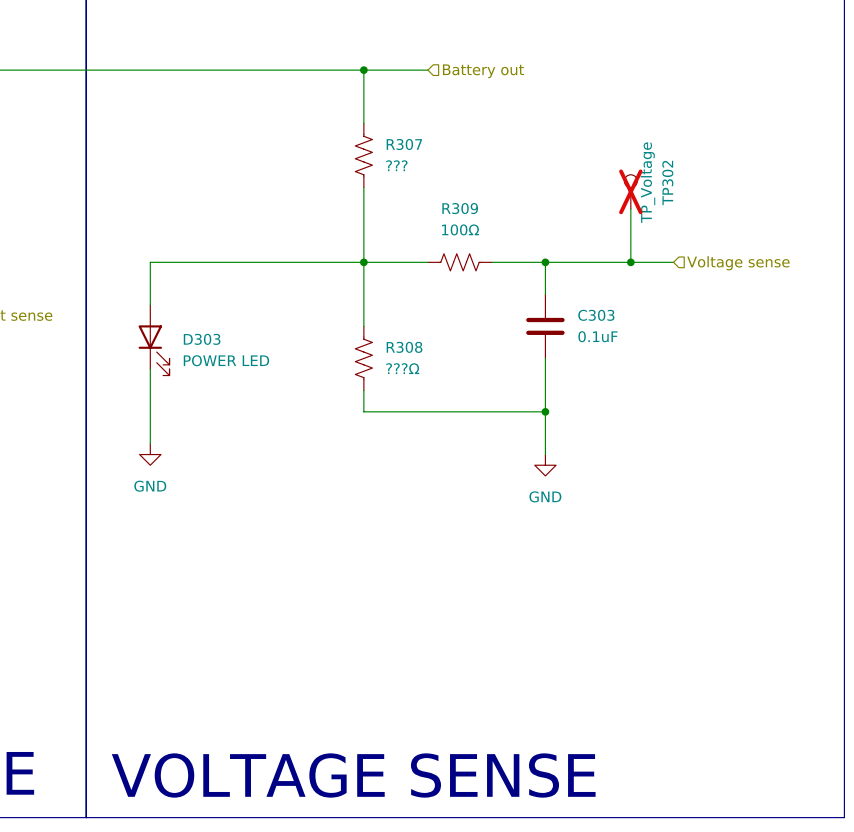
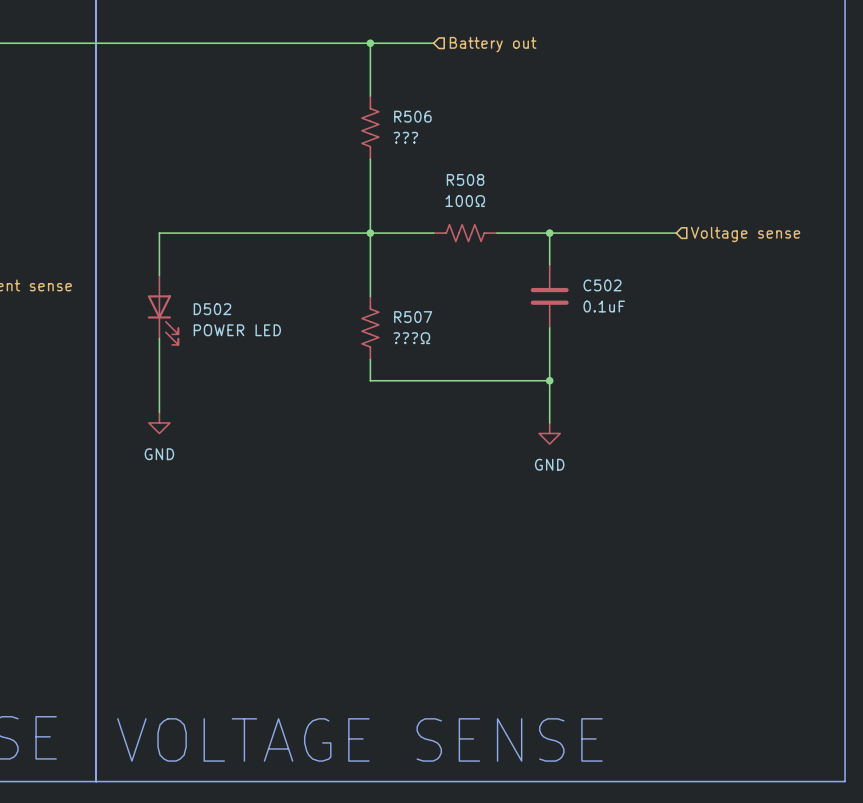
R307 name: R307 (404, 144) -> R506 (412, 116)
TP302: TP_Voltage (630, 191) -> none
R309 name: R309 (460, 208) -> R508 (465, 179)
wire: (630, 208) (630, 262) -> none
junction: (630, 262) -> none
C303 name: C303 (596, 315) -> C502 (602, 285)
D303 name: D303 (202, 339) -> D502 (212, 309)
R308 name: R308 (404, 347) -> R507 (413, 317)

